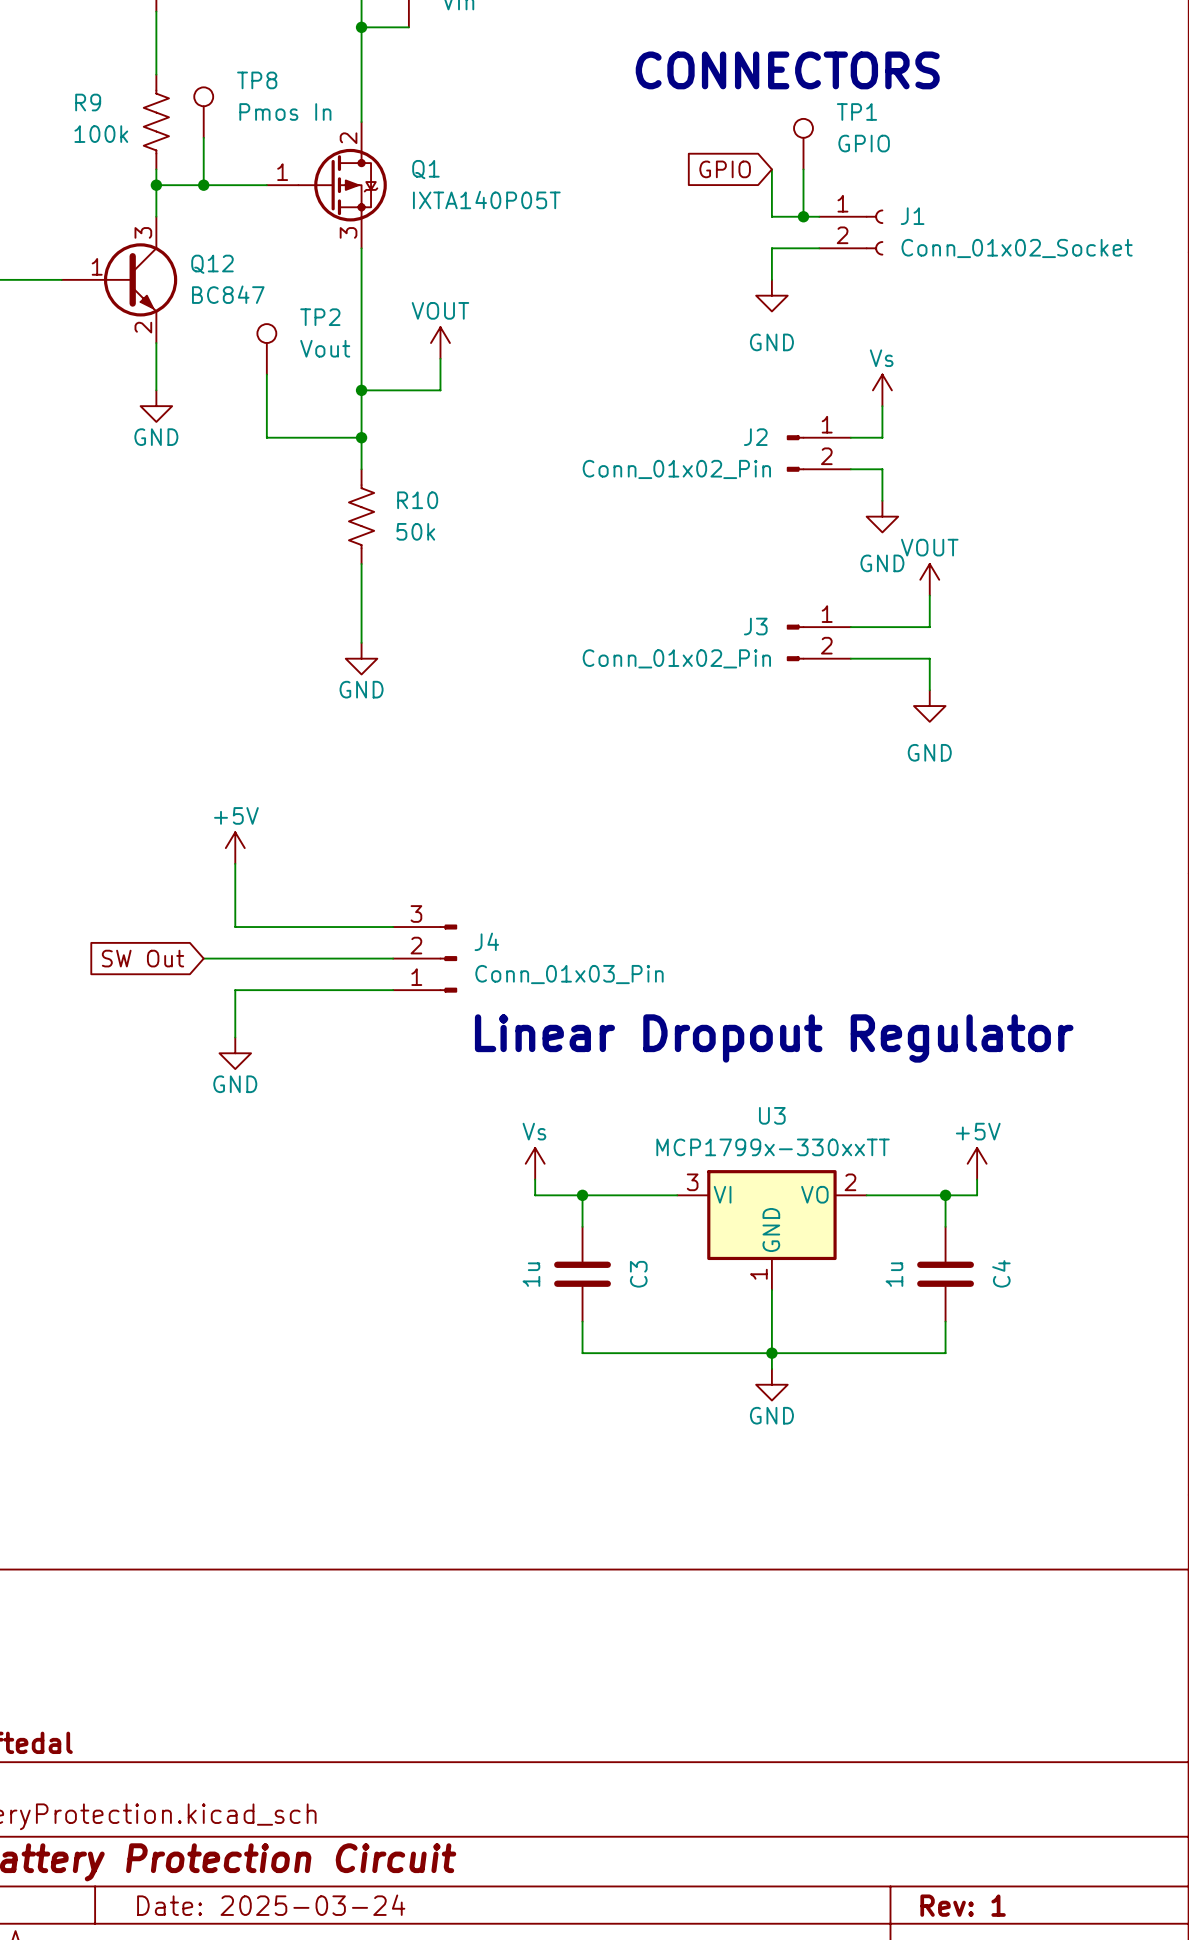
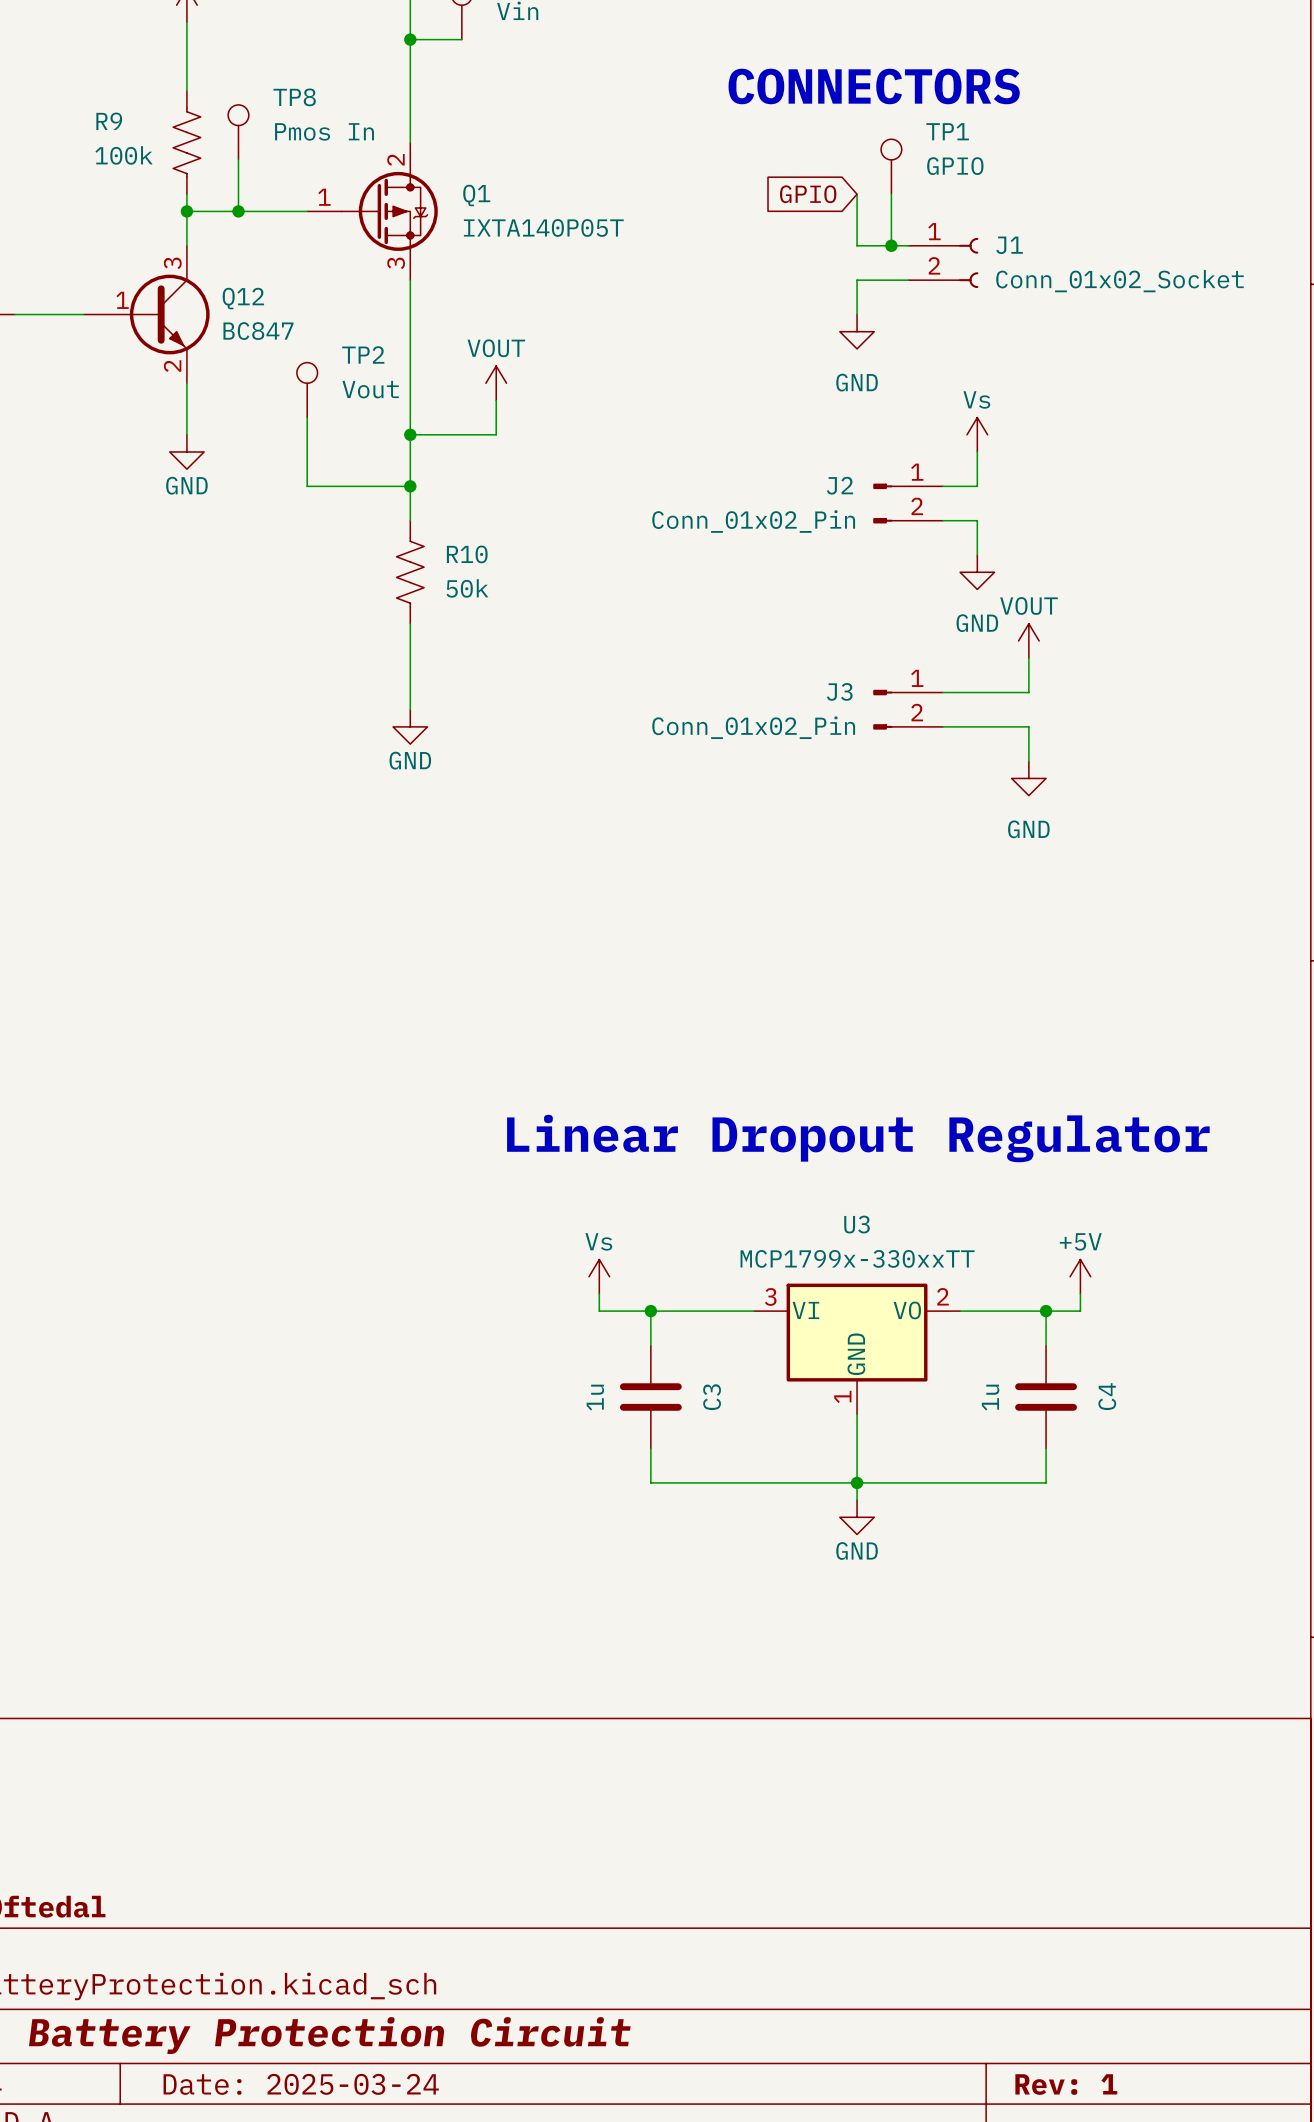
power symbol: +5V (235, 848) -> none
wire: (235, 863) (235, 927) (393, 927) -> none
global label: SW Out (143, 958) -> none
wire: (203, 958) (393, 958) -> none
J4: Conn_01x03_Pin (425, 958) -> none
wire: (393, 990) (235, 990) (235, 1037) -> none
power symbol: GND (235, 1053) -> none

